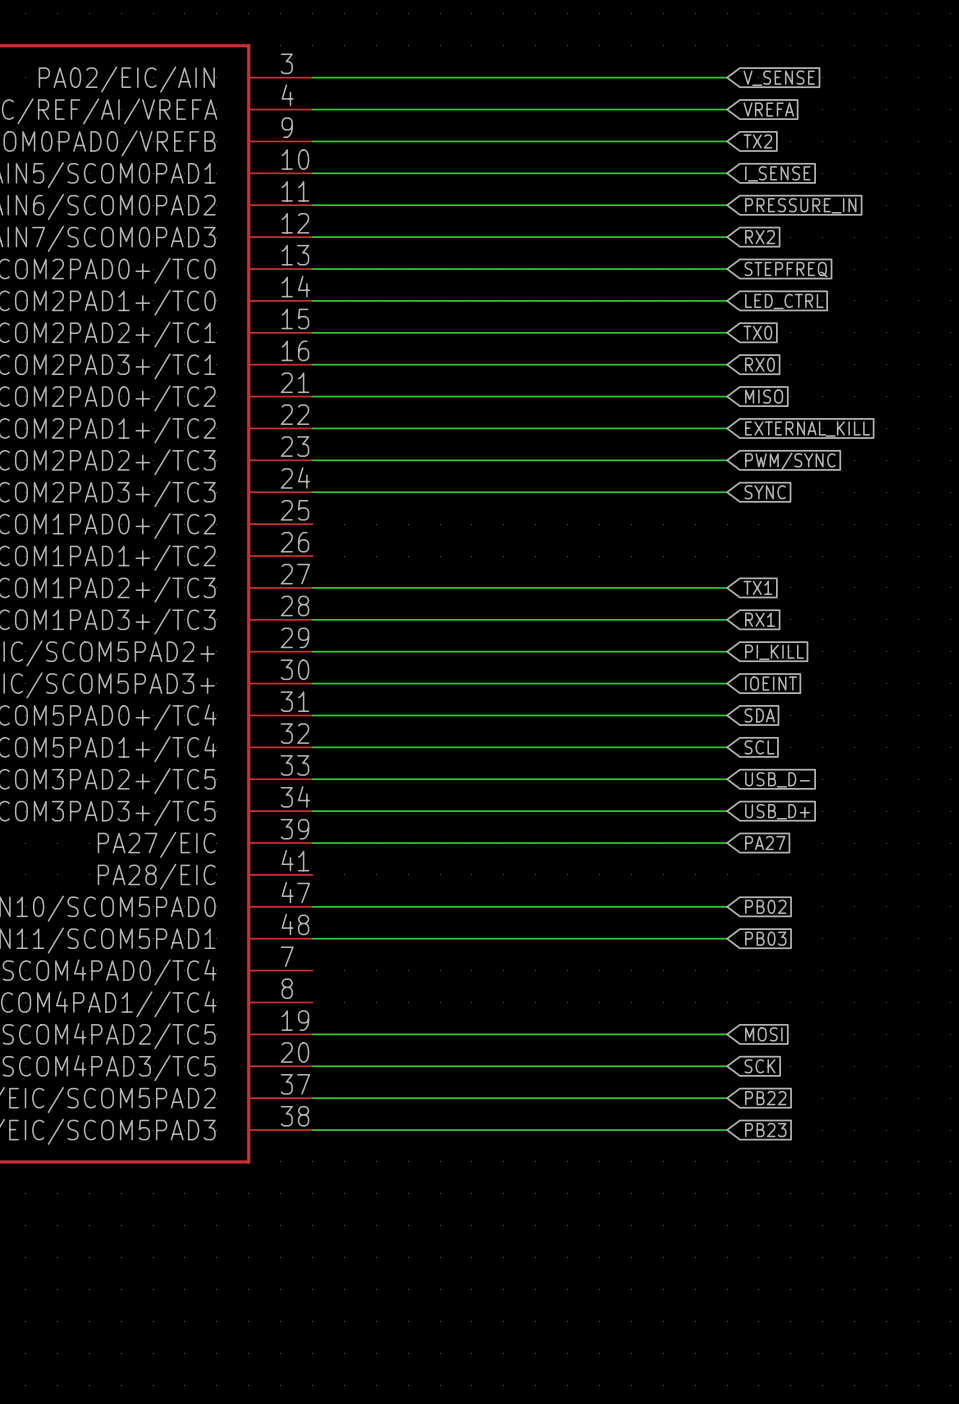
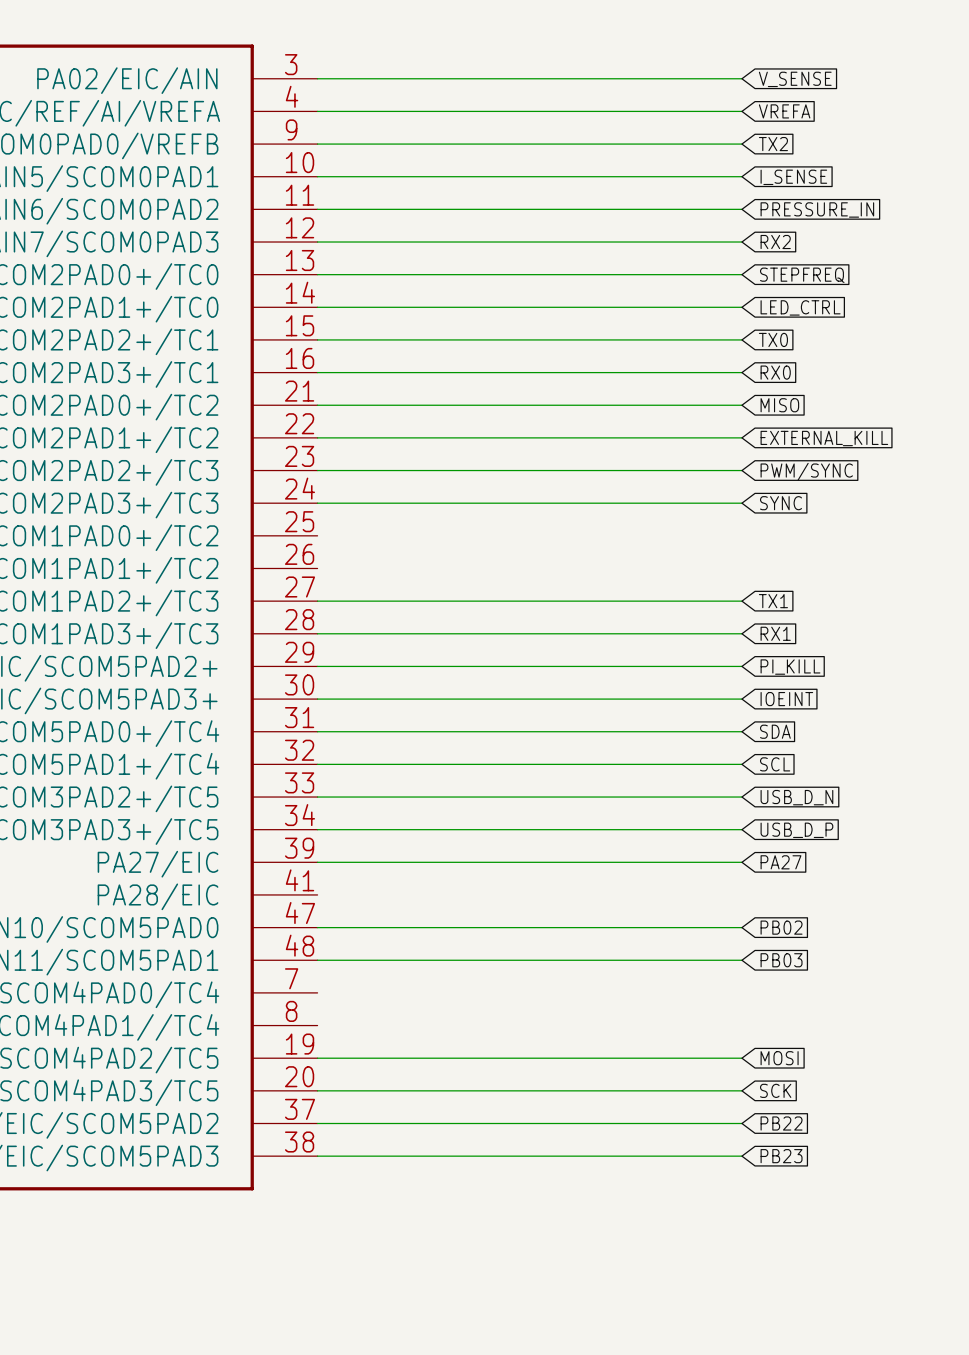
global label: USB_D- (777, 779) -> USB_D_N (796, 797)
global label: USB_D+ (777, 811) -> USB_D_P (796, 830)

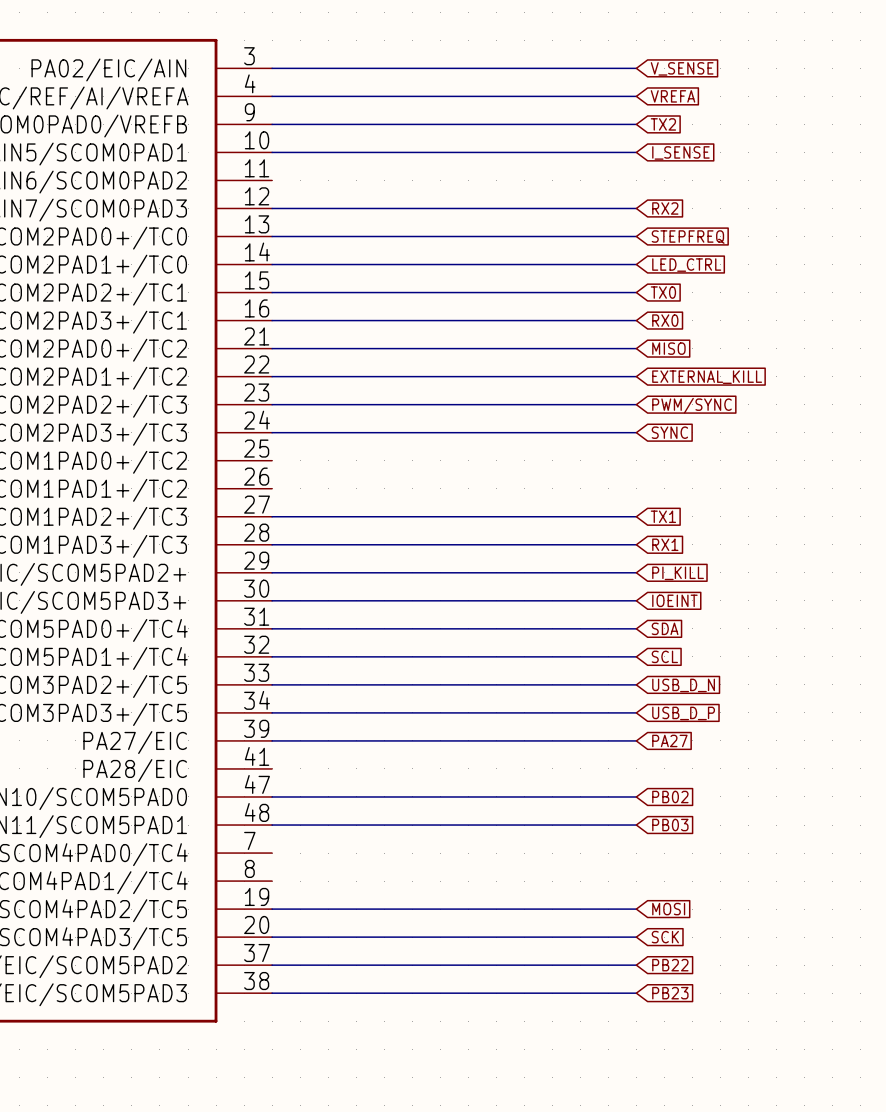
wire: (317, 209) (741, 209) -> none
global label: PRESSURE_IN (817, 209) -> none

